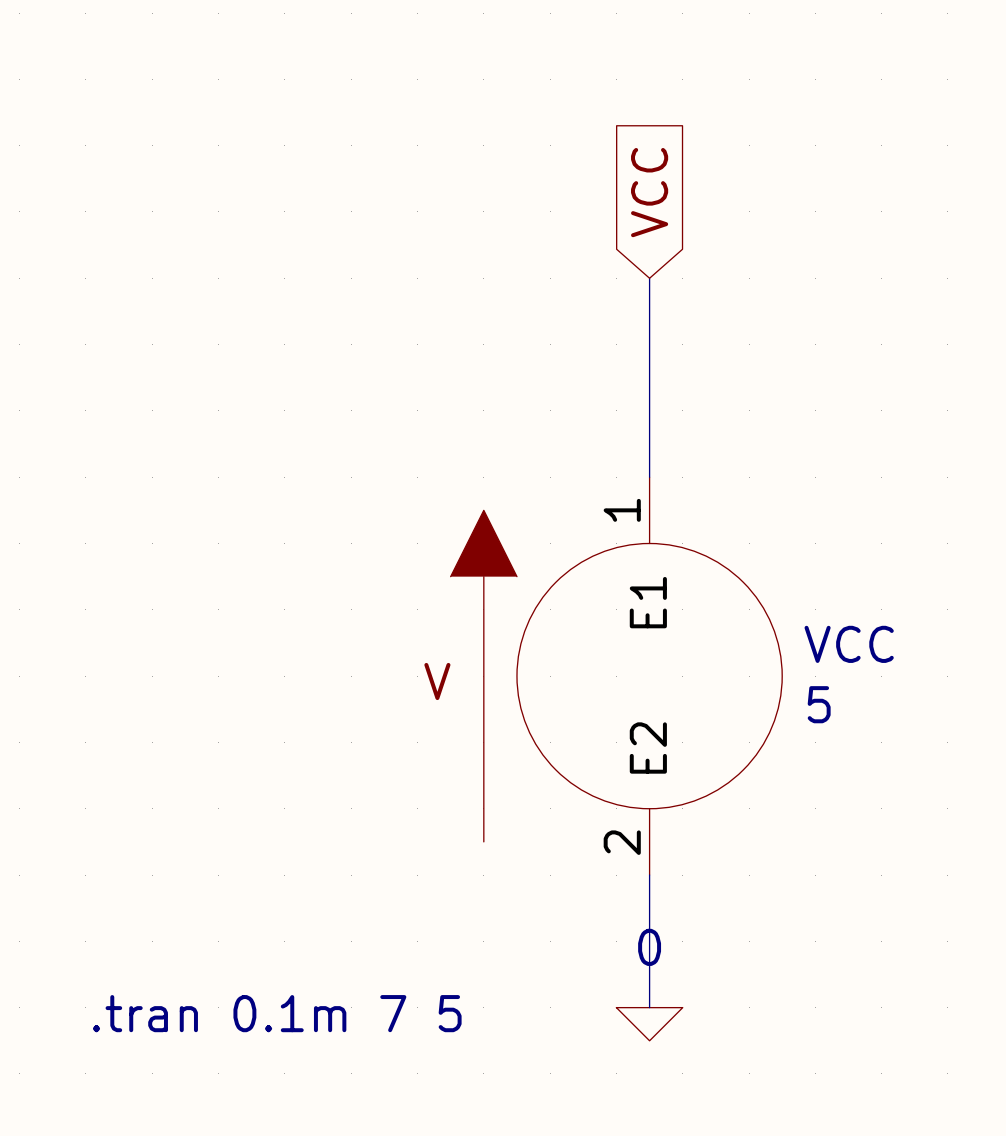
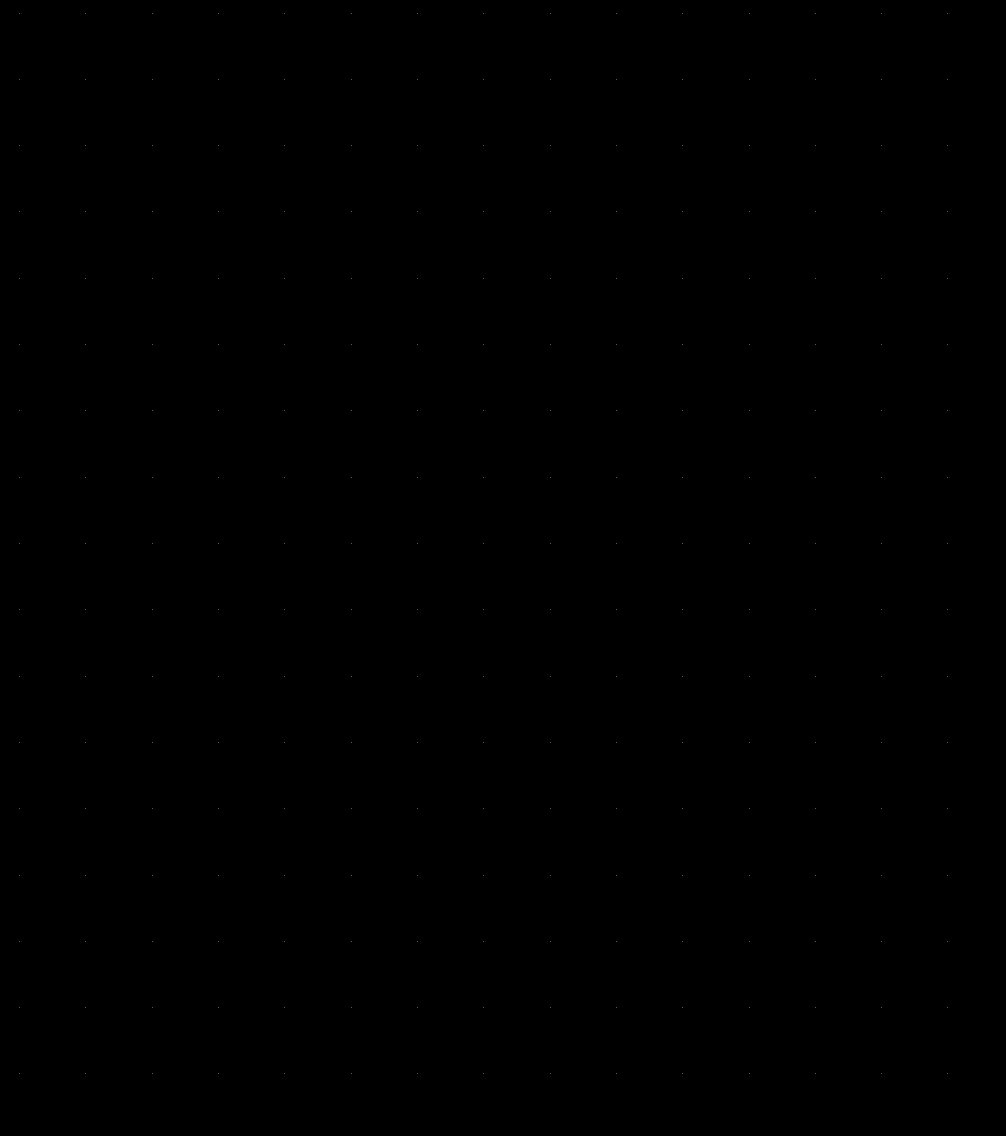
global label: VCC (649, 192) -> none
wire: (649, 278) (649, 477) -> none
VCC: 5 (616, 676) -> none
wire: (649, 875) (649, 1007) -> none
text: .tran 0.1m 7 5 (277, 1013) -> none
power symbol: 0 (649, 1024) -> none

